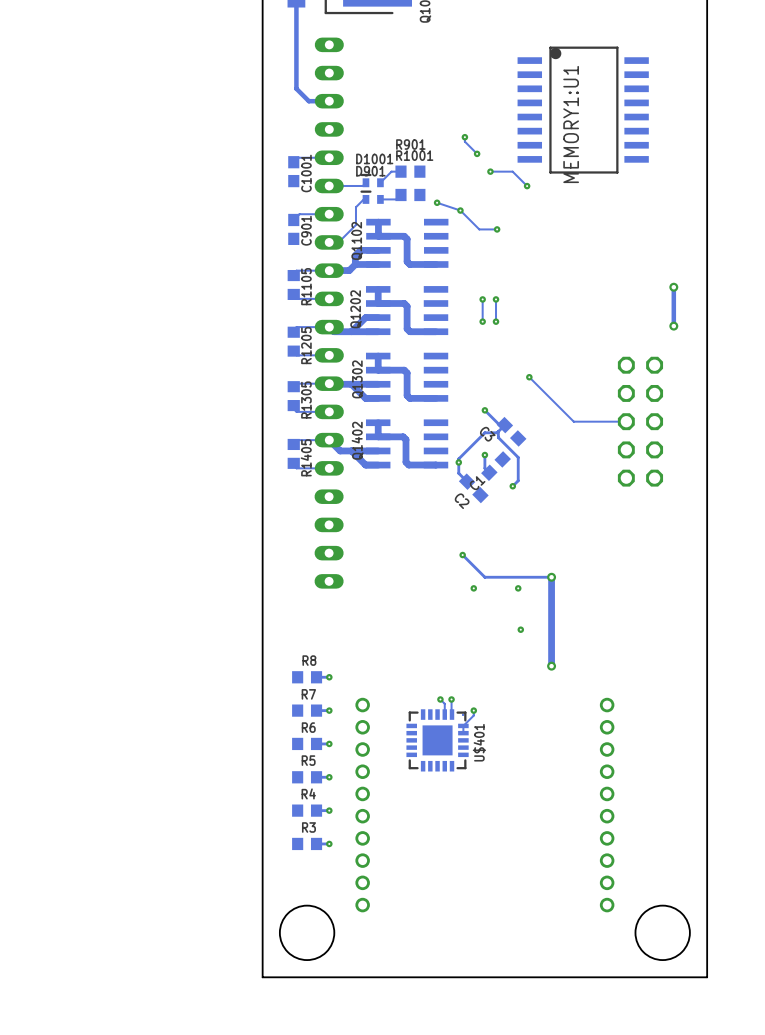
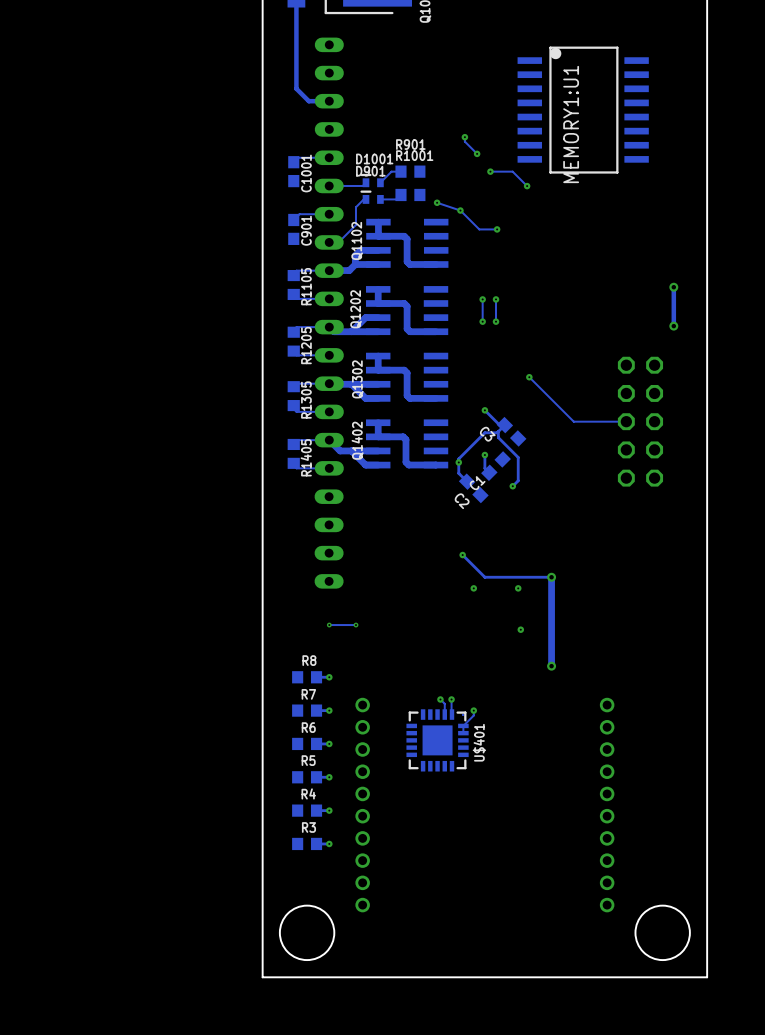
via: none -> (329, 625)
track: none -> (355, 625) (329, 625)
via: none -> (355, 625)

